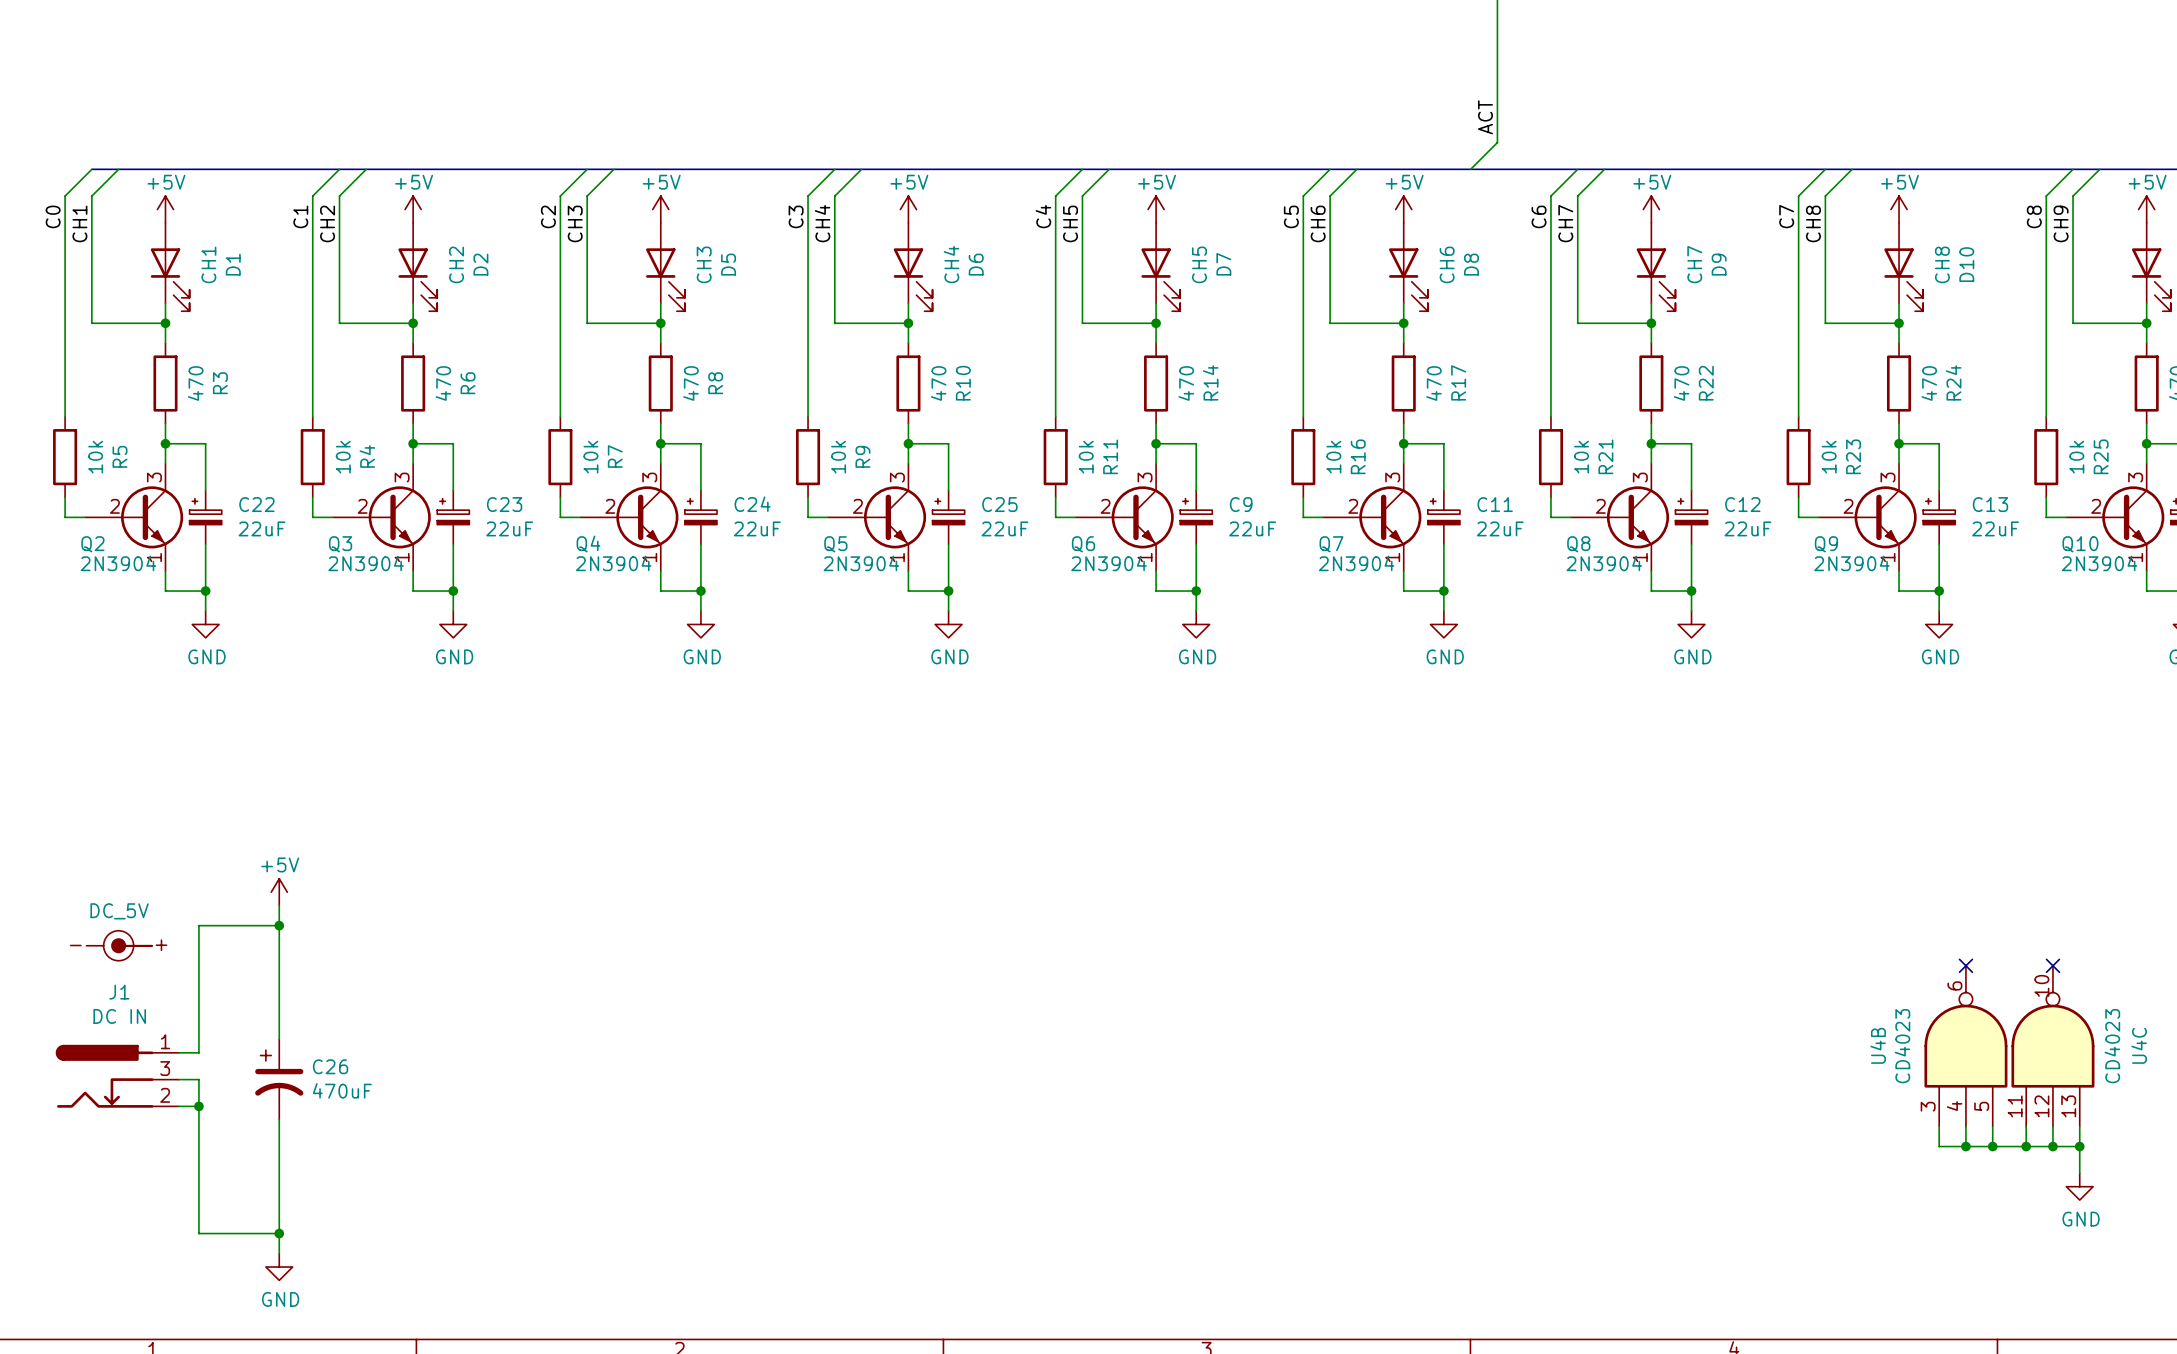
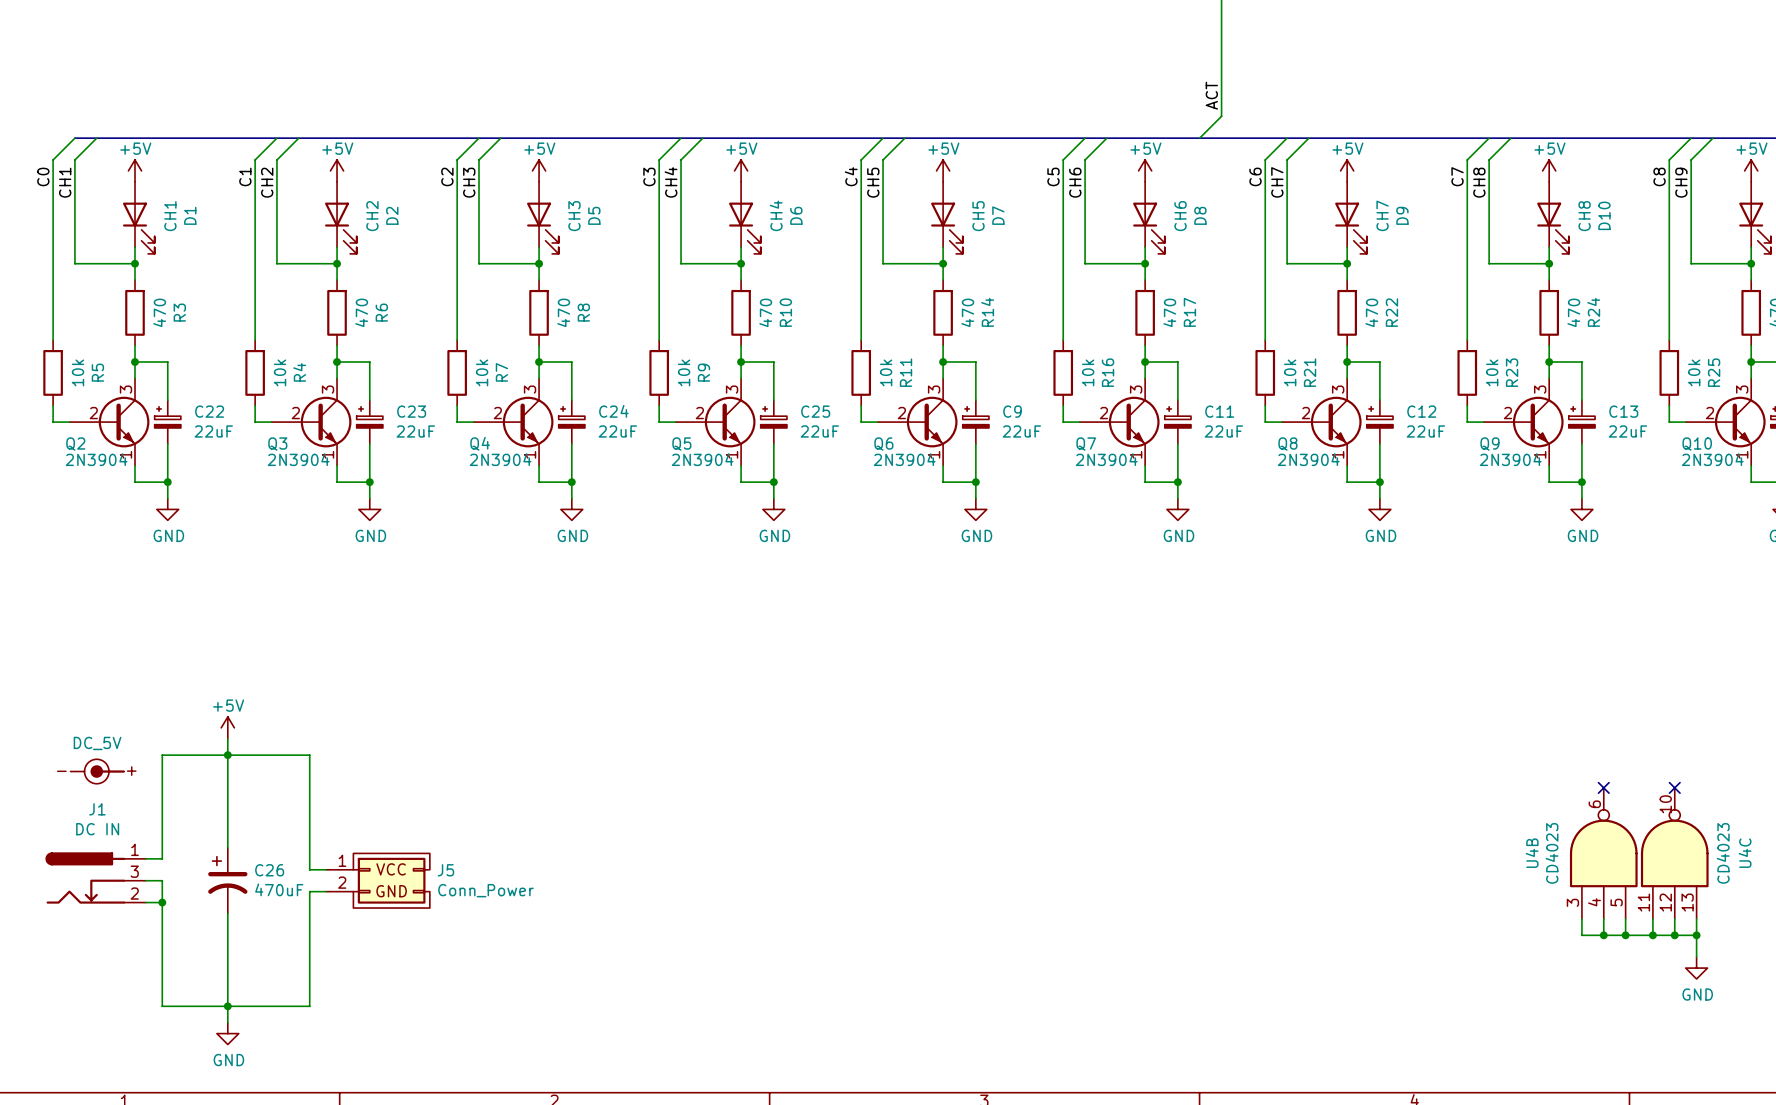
wire: none -> (227, 755) (309, 755) (309, 869) (326, 869)
J5: none -> Conn_Power (378, 880)
wire: none -> (326, 891) (309, 891) (309, 1006) (227, 1006)

